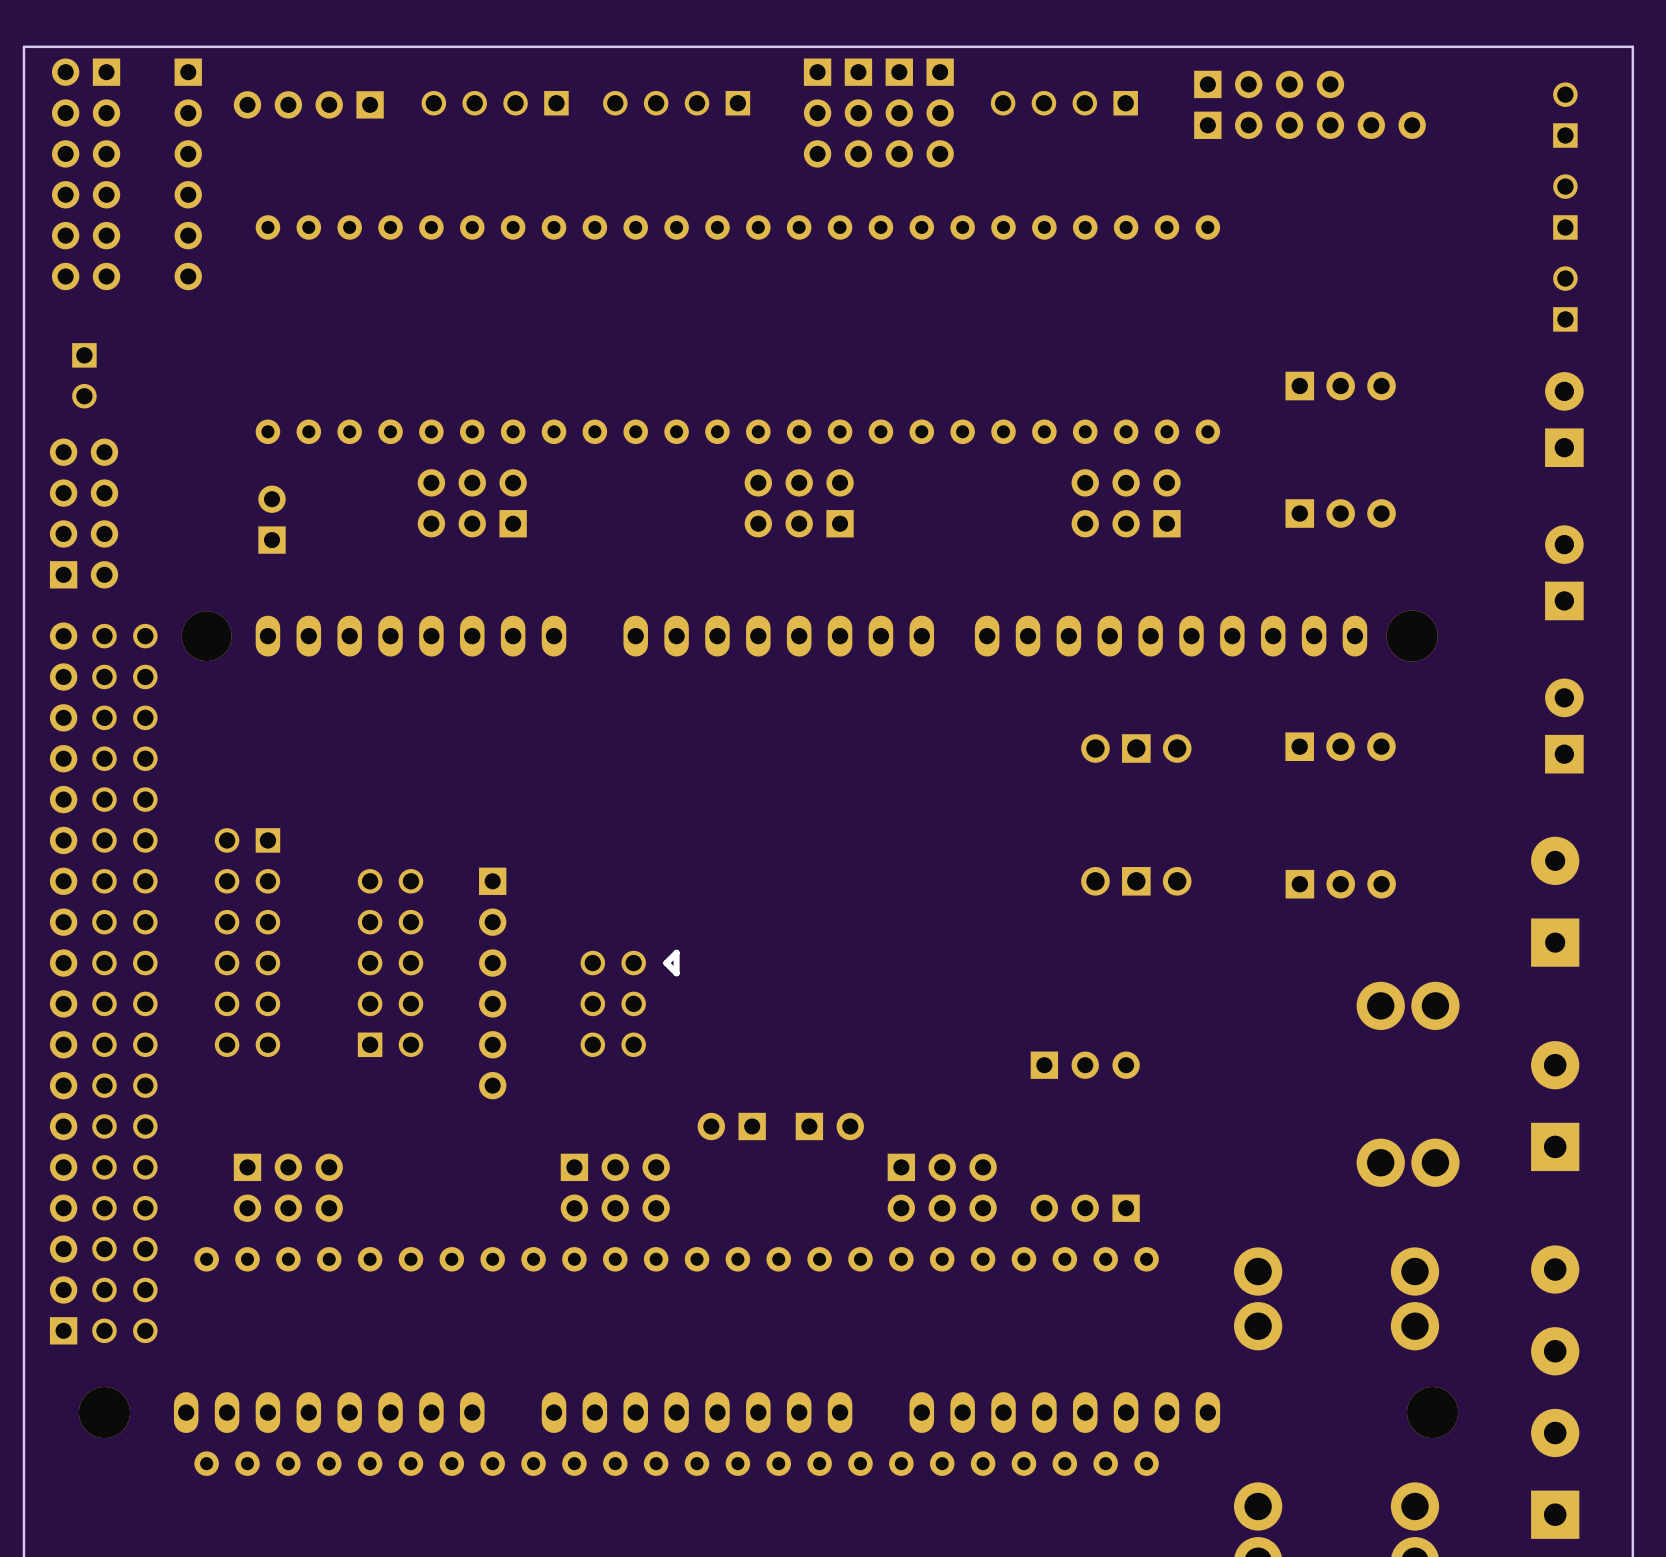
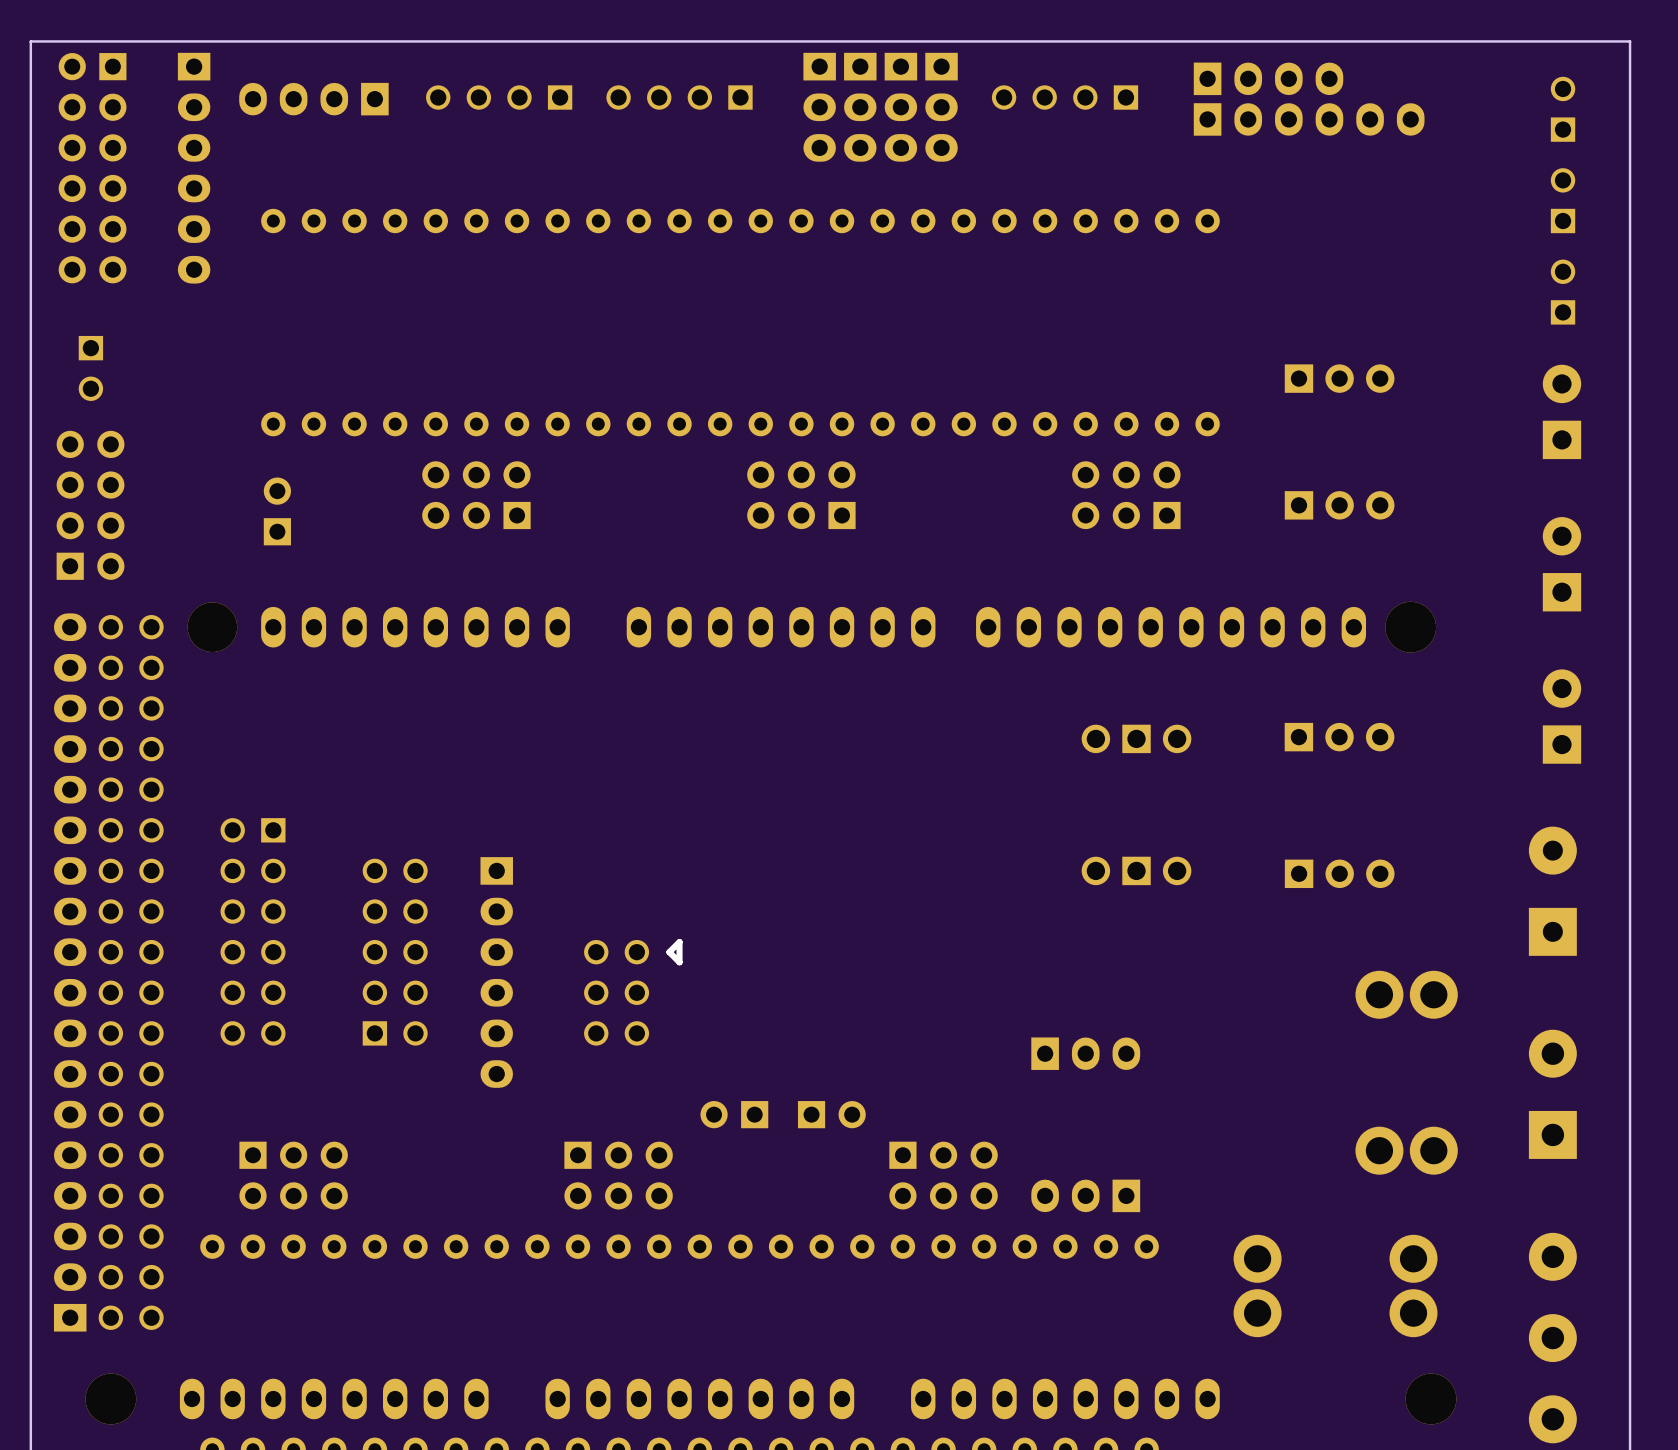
part footprint: [174, 58, 202, 291] -> [177, 52, 211, 284]
part footprint: [803, 58, 832, 168] -> [803, 52, 836, 162]
part footprint: [844, 58, 873, 168] -> [844, 52, 877, 162]
part footprint: [885, 58, 913, 168] -> [884, 52, 918, 162]
part footprint: [926, 58, 954, 168] -> [925, 52, 958, 162]
part footprint: [1194, 70, 1345, 99] -> [1193, 62, 1344, 96]
part footprint: [233, 91, 384, 119] -> [239, 82, 389, 116]
part footprint: [1194, 111, 1426, 139] -> [1193, 103, 1425, 136]
part footprint: [49, 622, 78, 1345] -> [53, 613, 87, 1332]
part footprint: [479, 867, 507, 1100] -> [480, 857, 513, 1088]
part footprint: [1030, 1051, 1140, 1079] -> [1031, 1037, 1141, 1070]
part footprint: [1030, 1194, 1140, 1222] -> [1031, 1179, 1141, 1213]

